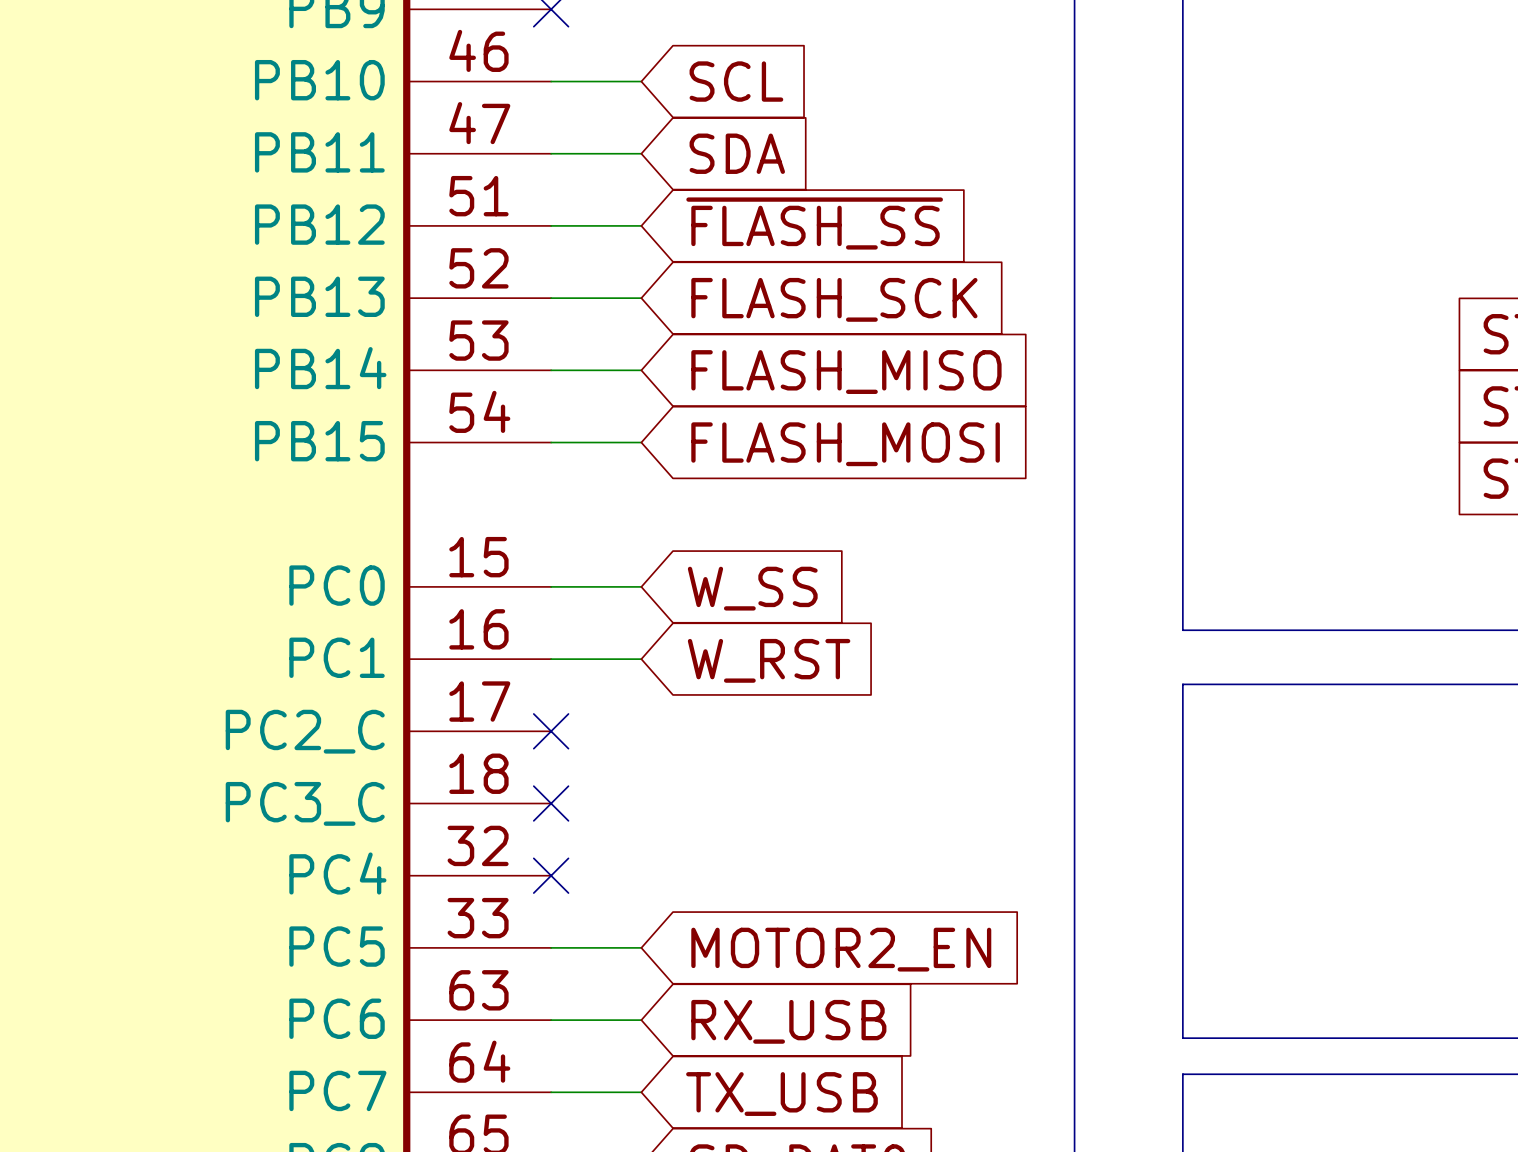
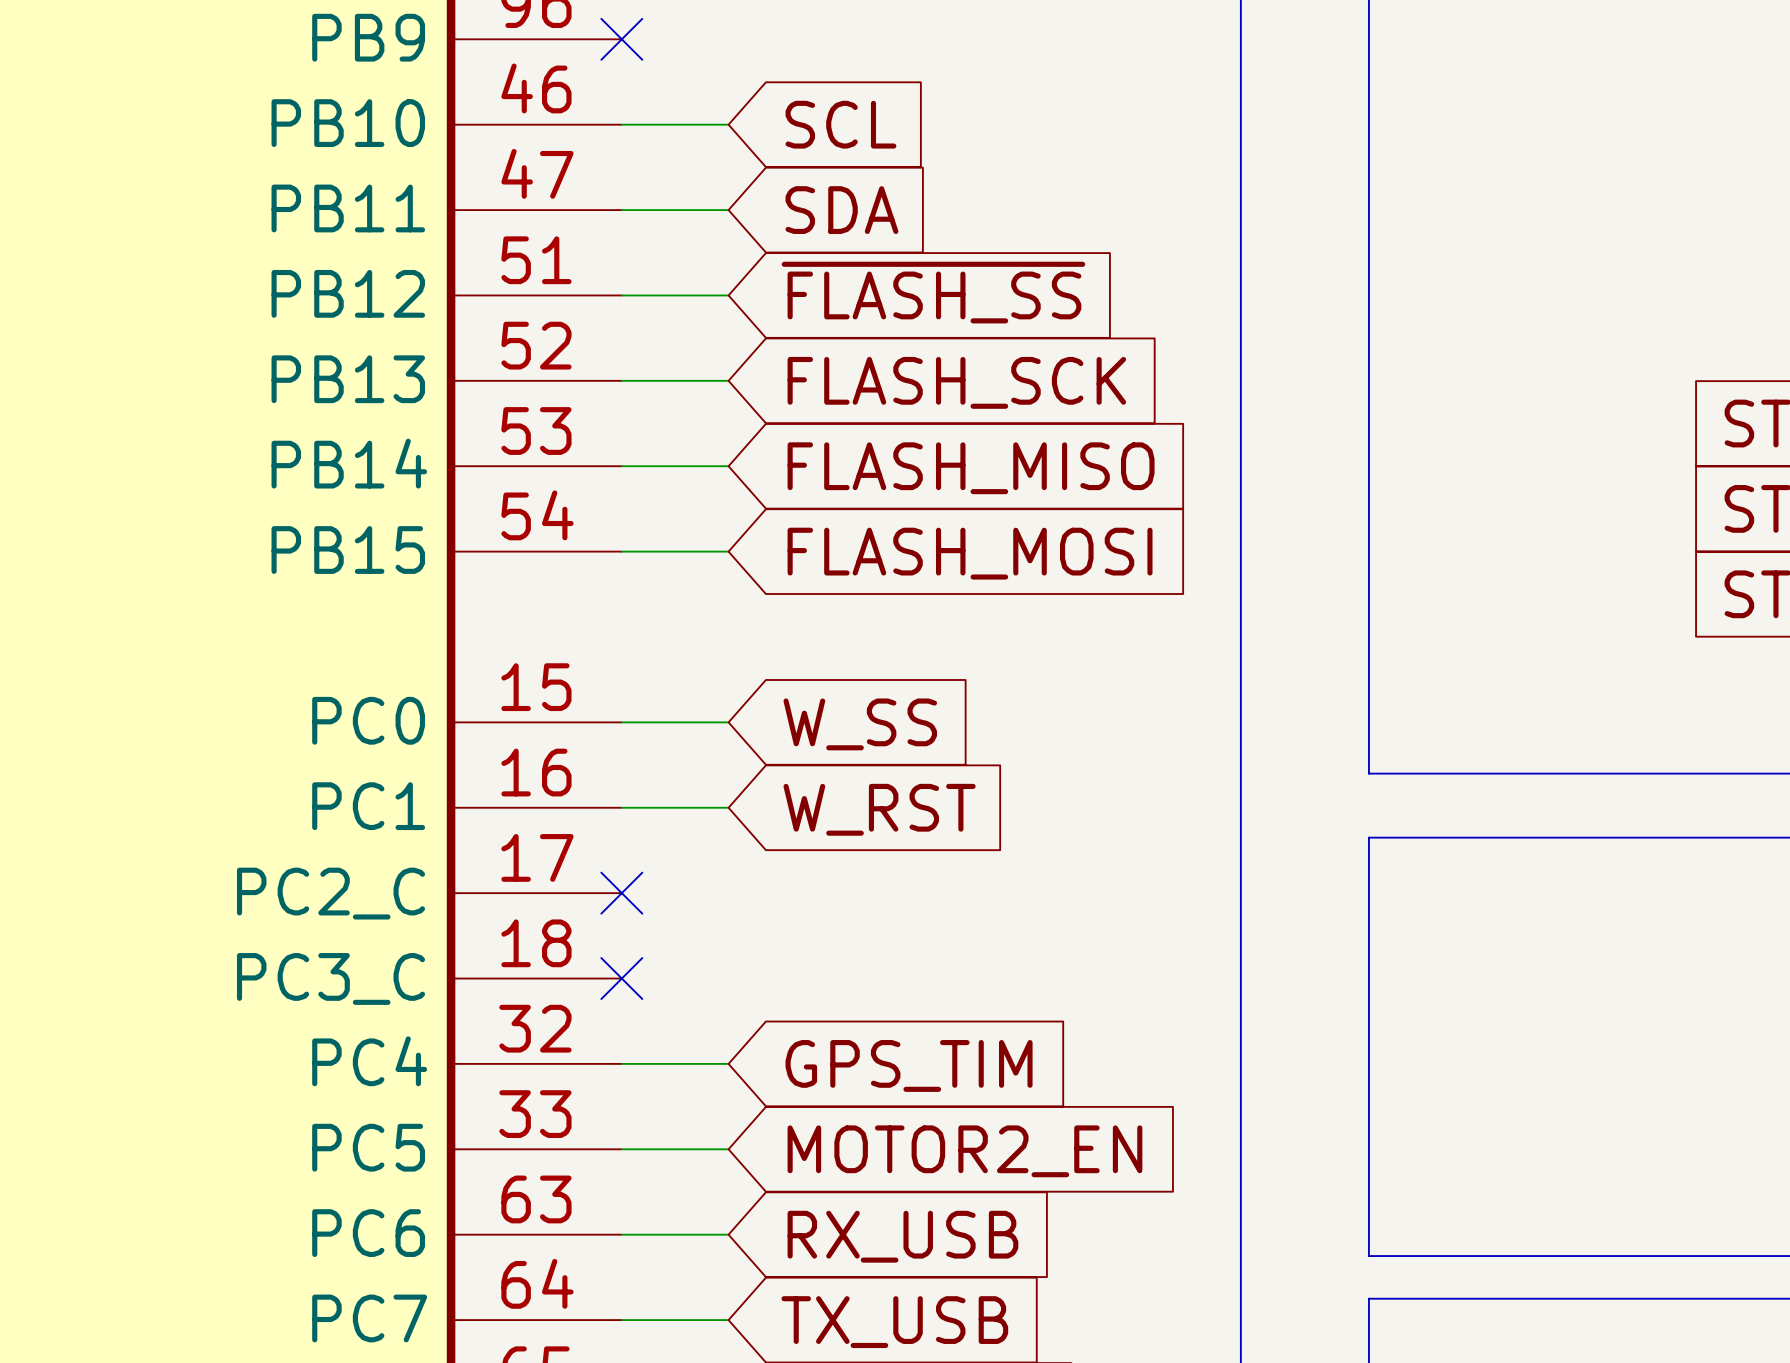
wire: none -> (621, 1063) (728, 1063)
no-connect mark: (551, 875) -> none
global label: none -> GPS_TIM (909, 1065)

